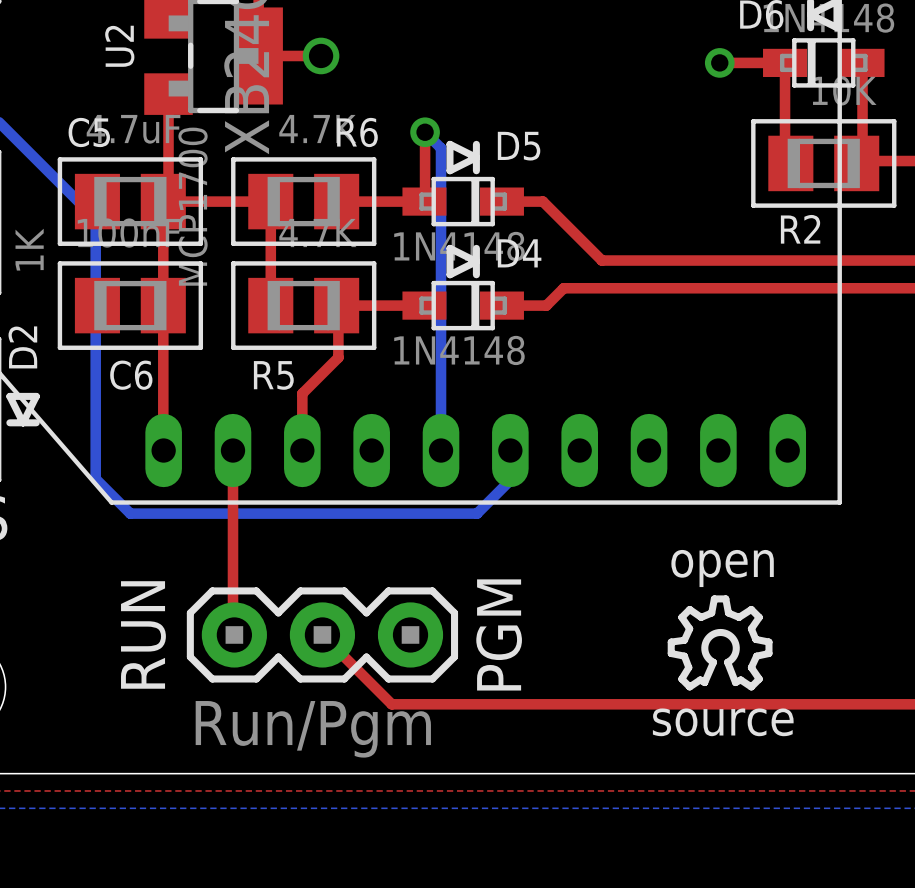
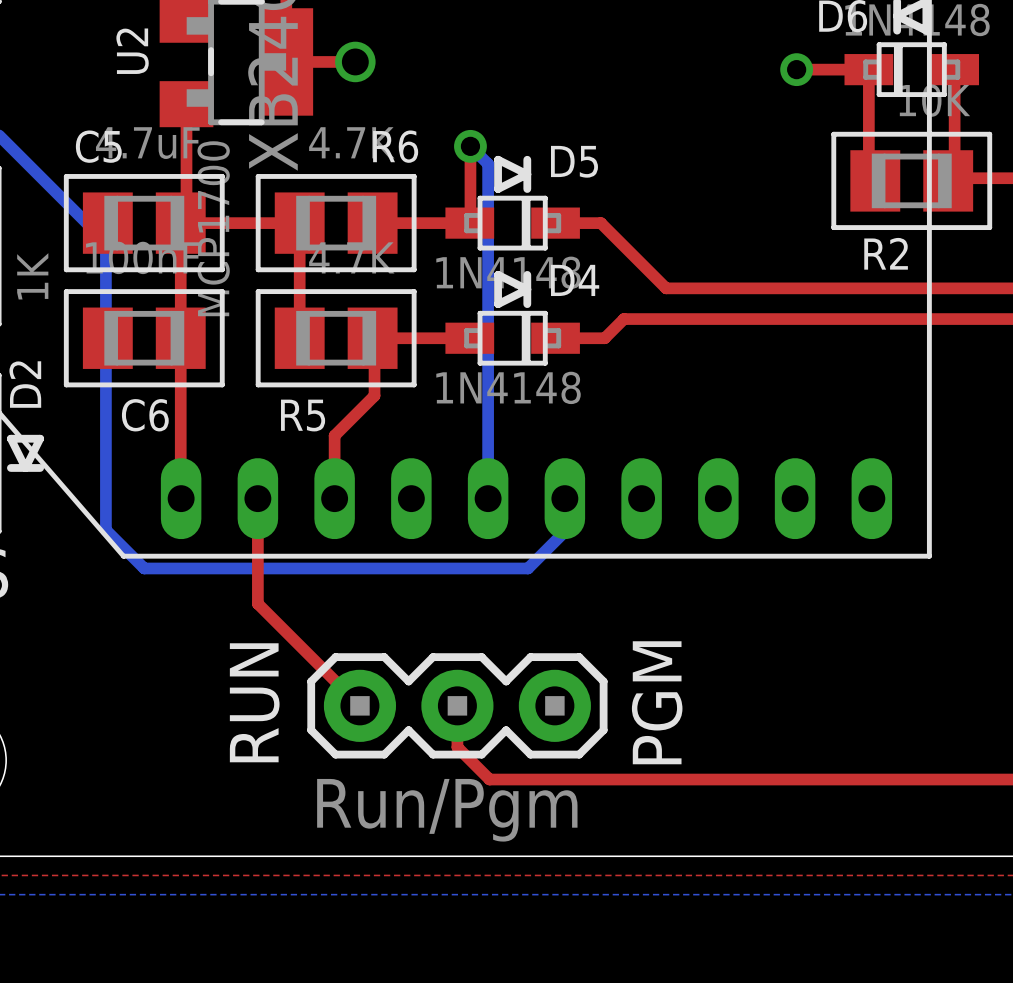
top track: (232, 545) (234, 634) -> (257, 603) (356, 702)
text: open (722, 568) -> none
drawing: [667, 595, 773, 691] -> none
text position: RUN (143, 634) -> RUN (254, 702)
part position: (322, 634) -> (457, 705)
text position: PGM (499, 634) -> PGM (657, 702)
top track: (325, 637) (391, 704) (442, 704) -> (457, 705) (457, 747) (489, 779)
text: source (723, 722) -> none

